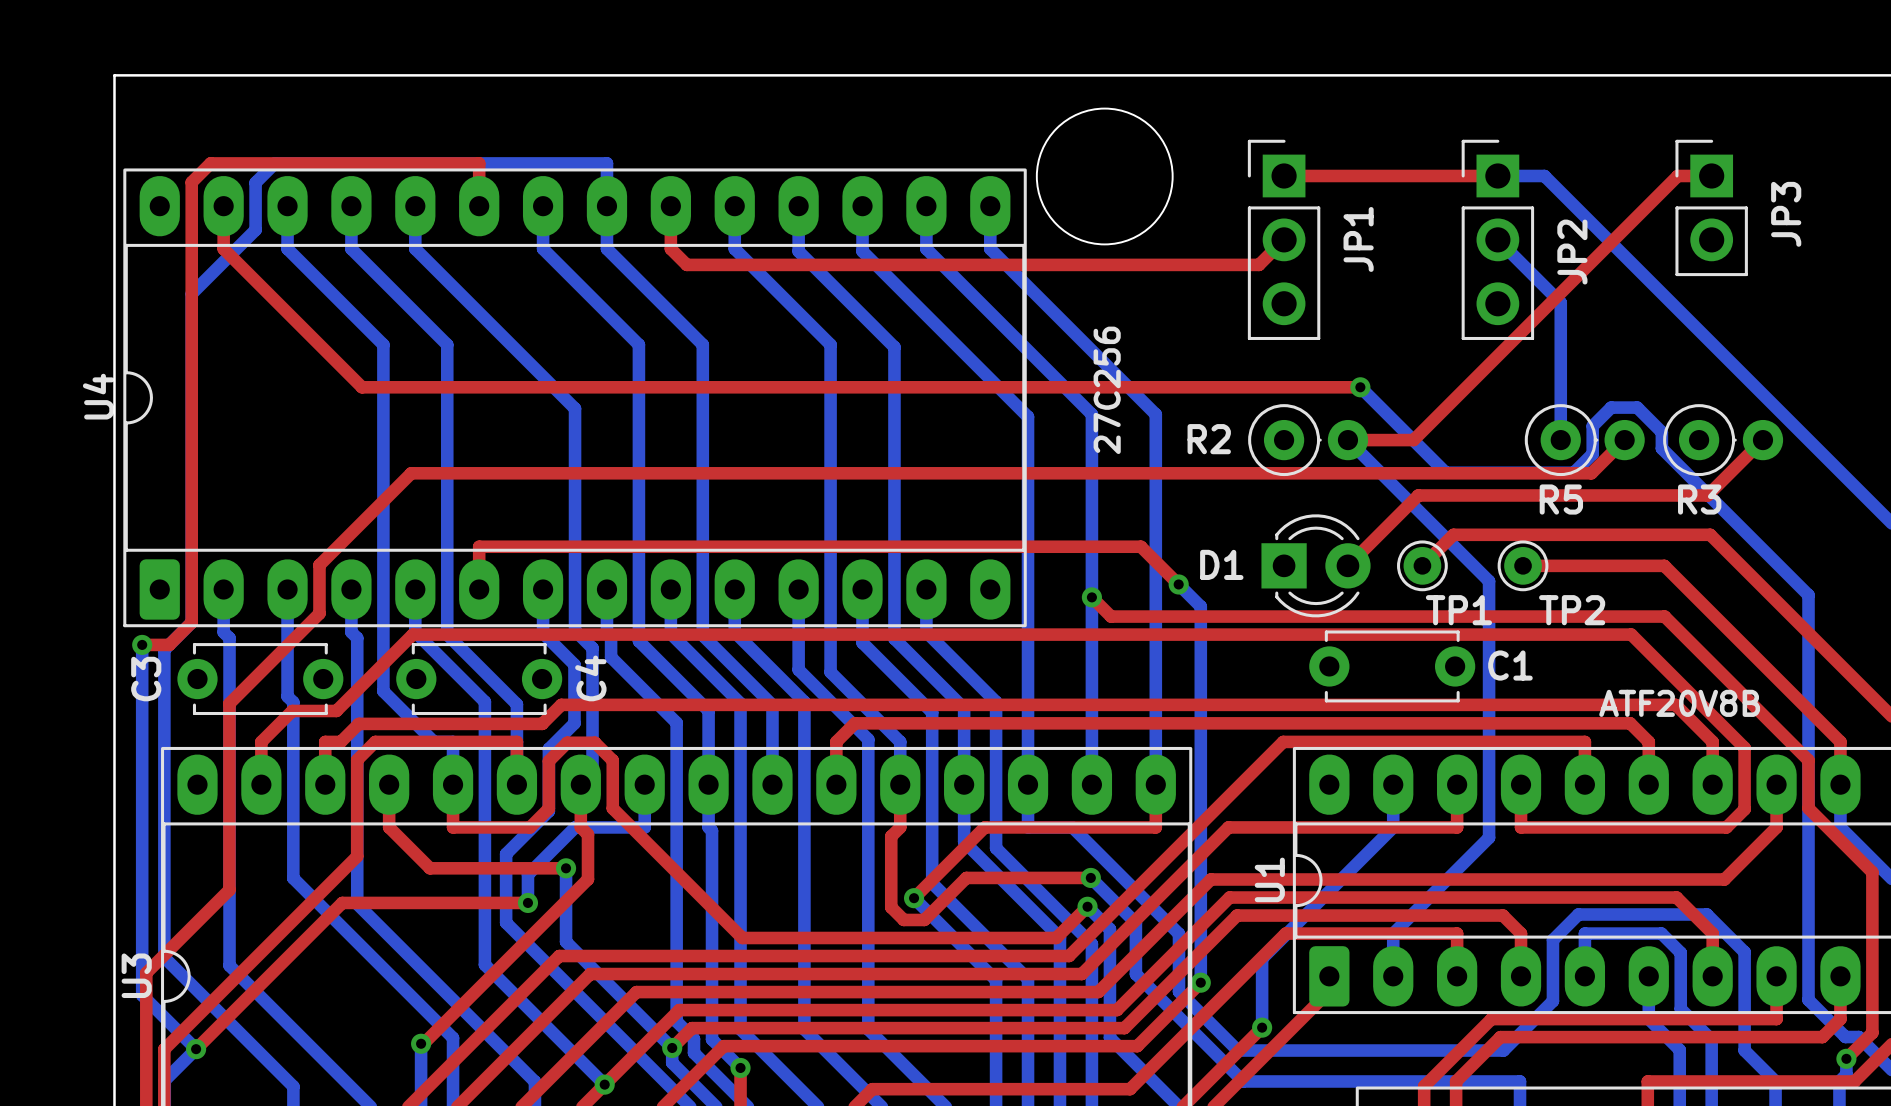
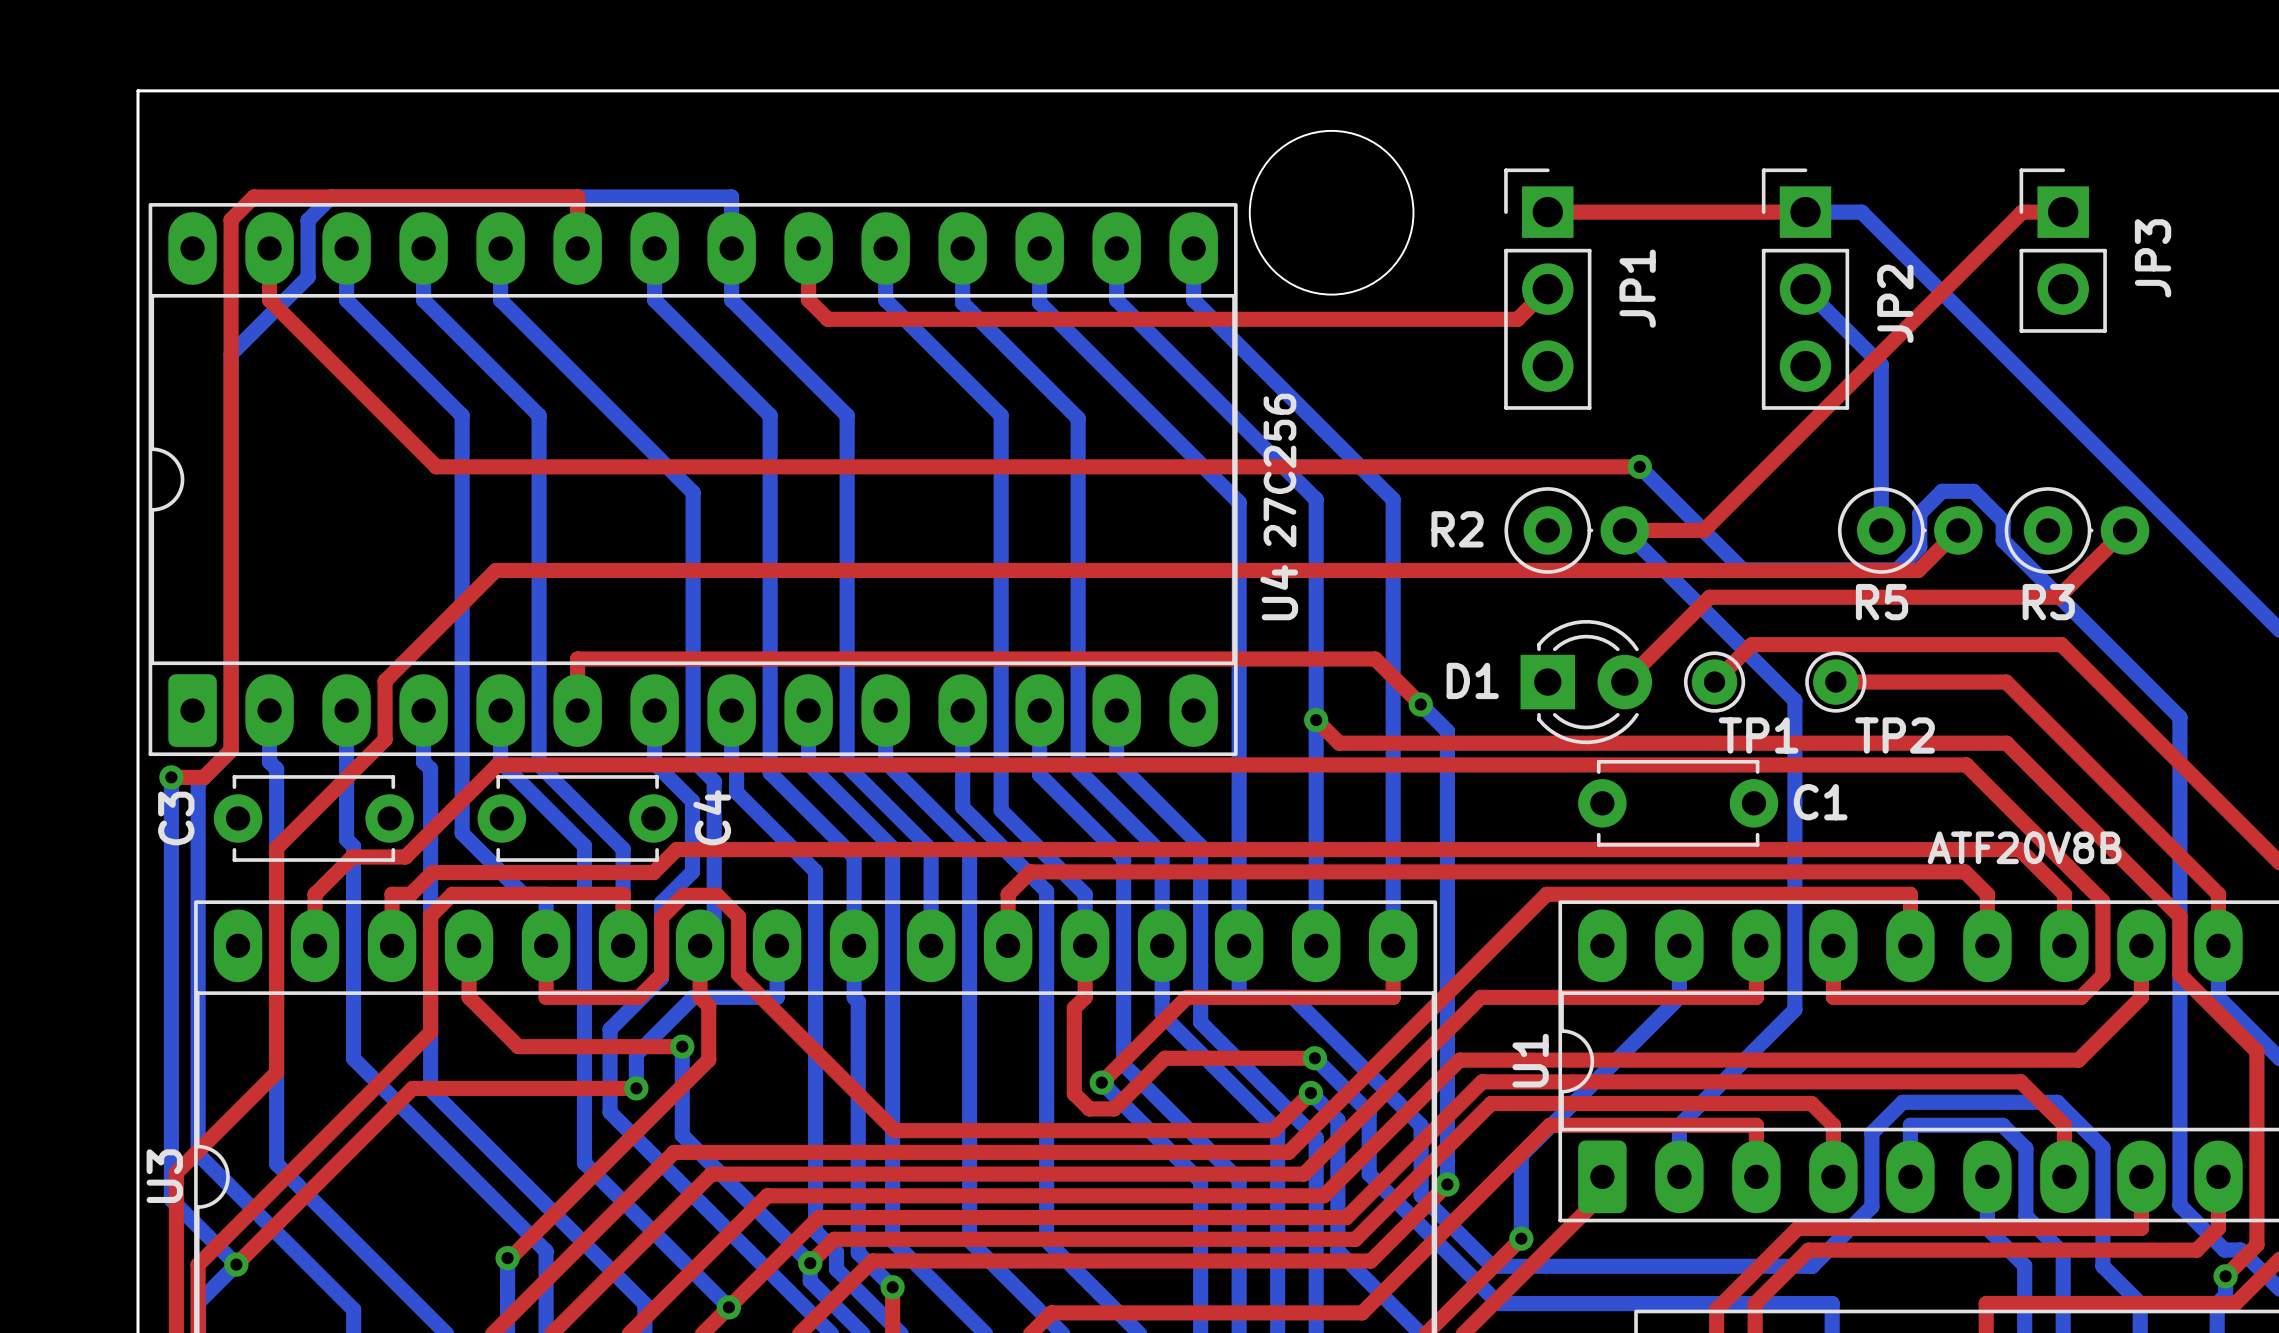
text position: 27C256 (1107, 390) -> 27C256 (1279, 470)
U4 name position: U4 (98, 396) -> U4 (1279, 592)

